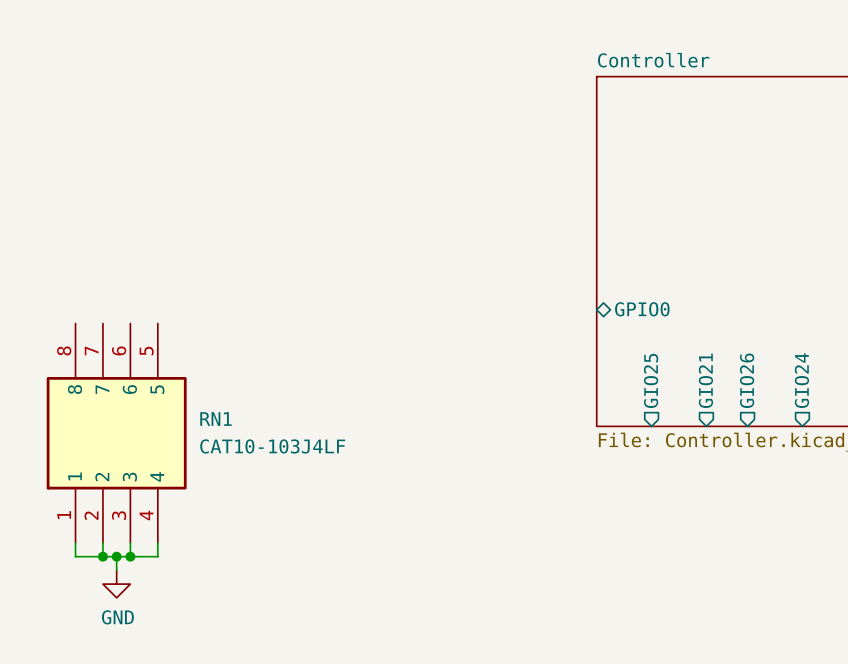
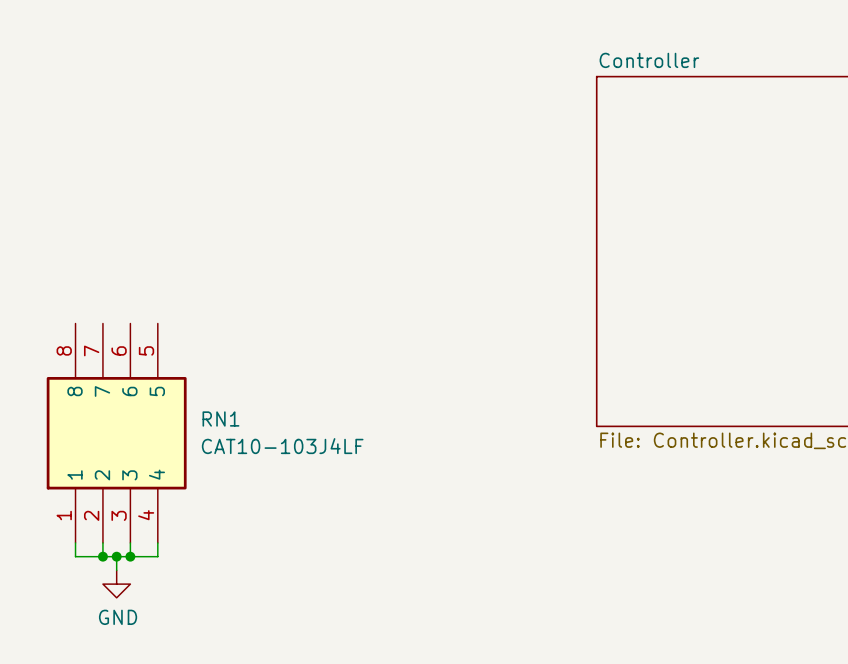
sheet pin: GPIO0 (642, 309) -> none
sheet pin: GIO25 (651, 380) -> none
sheet pin: GIO21 (705, 380) -> none
sheet pin: GIO26 (747, 380) -> none
sheet pin: GIO24 (801, 380) -> none

